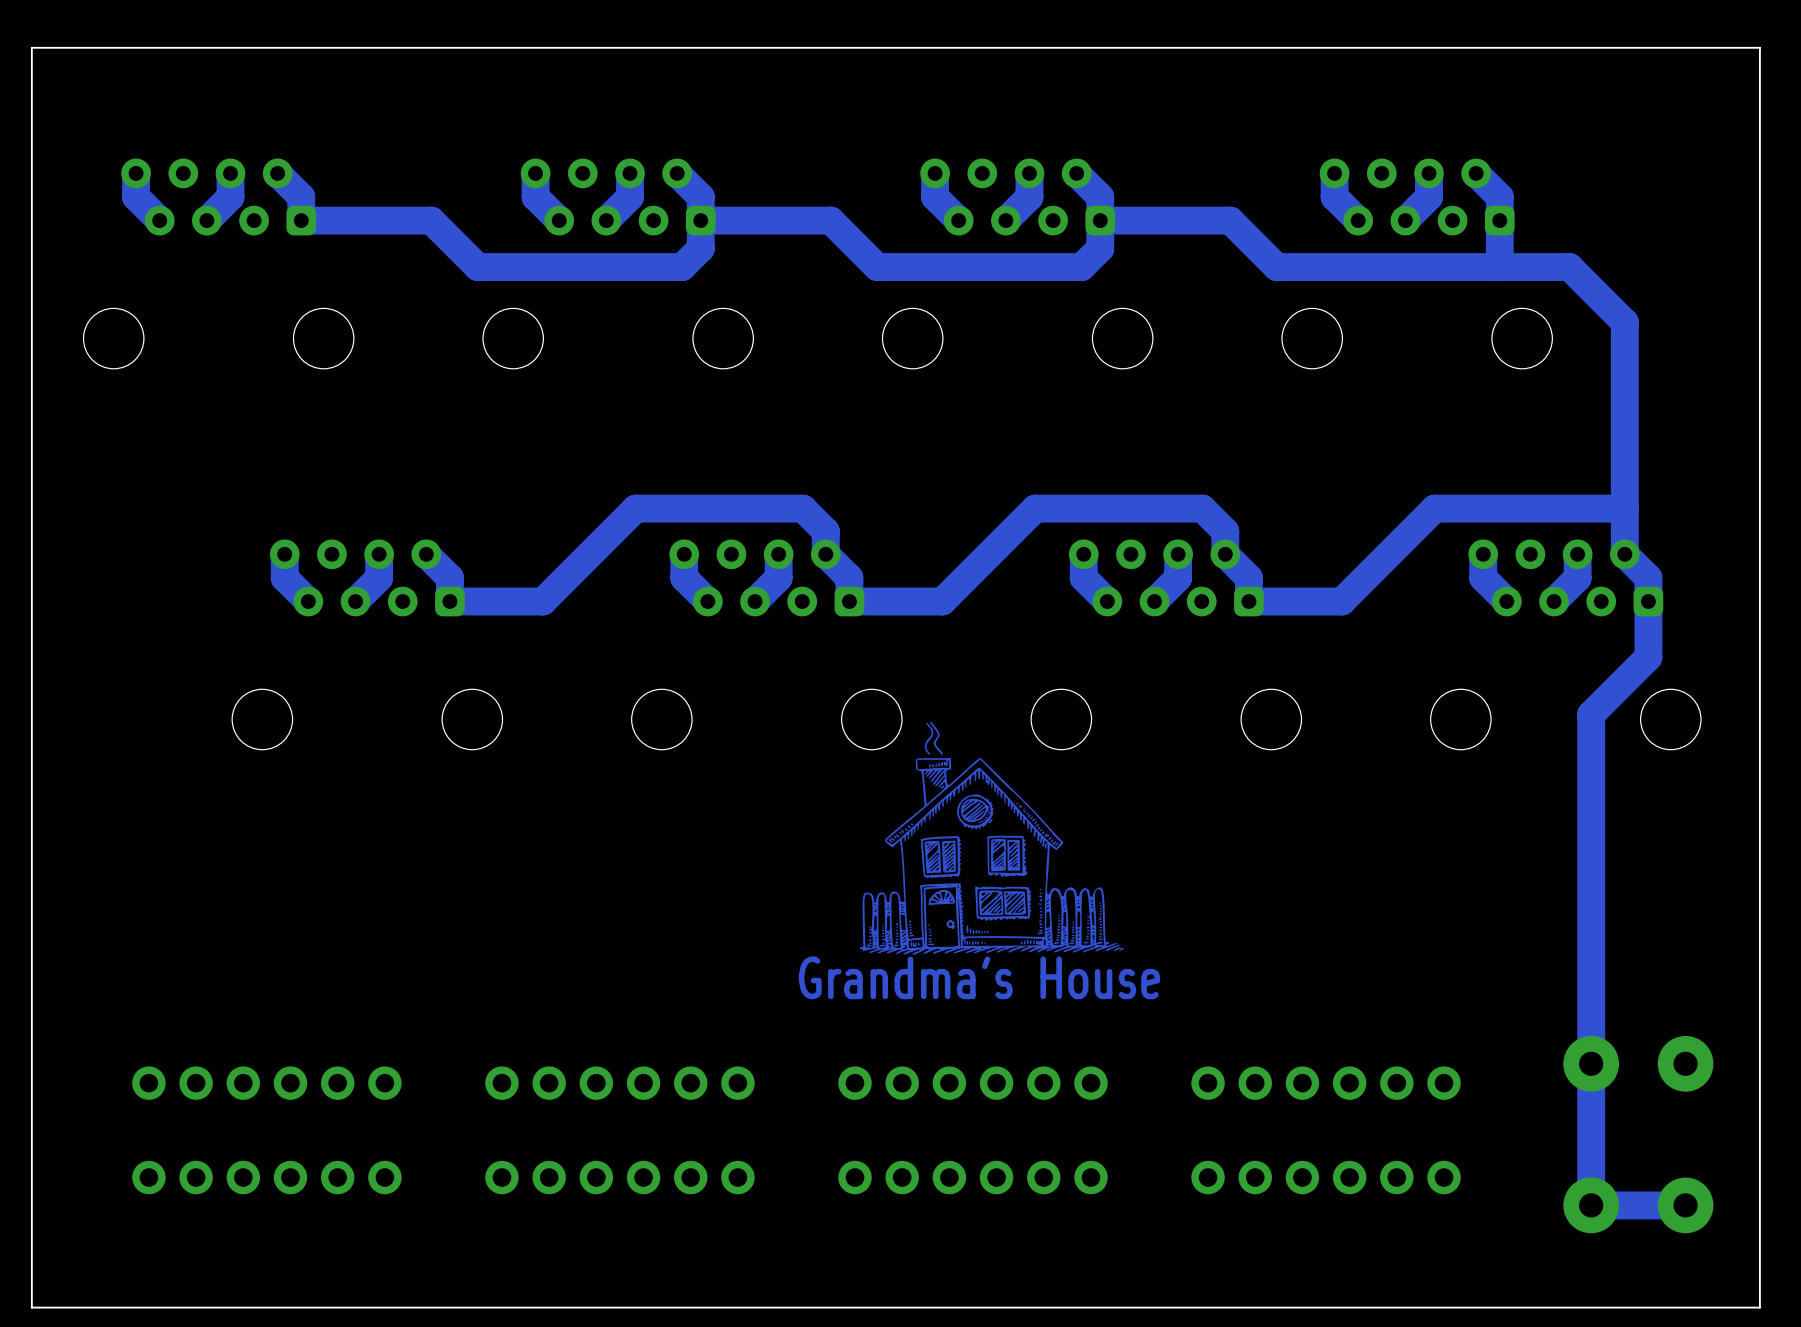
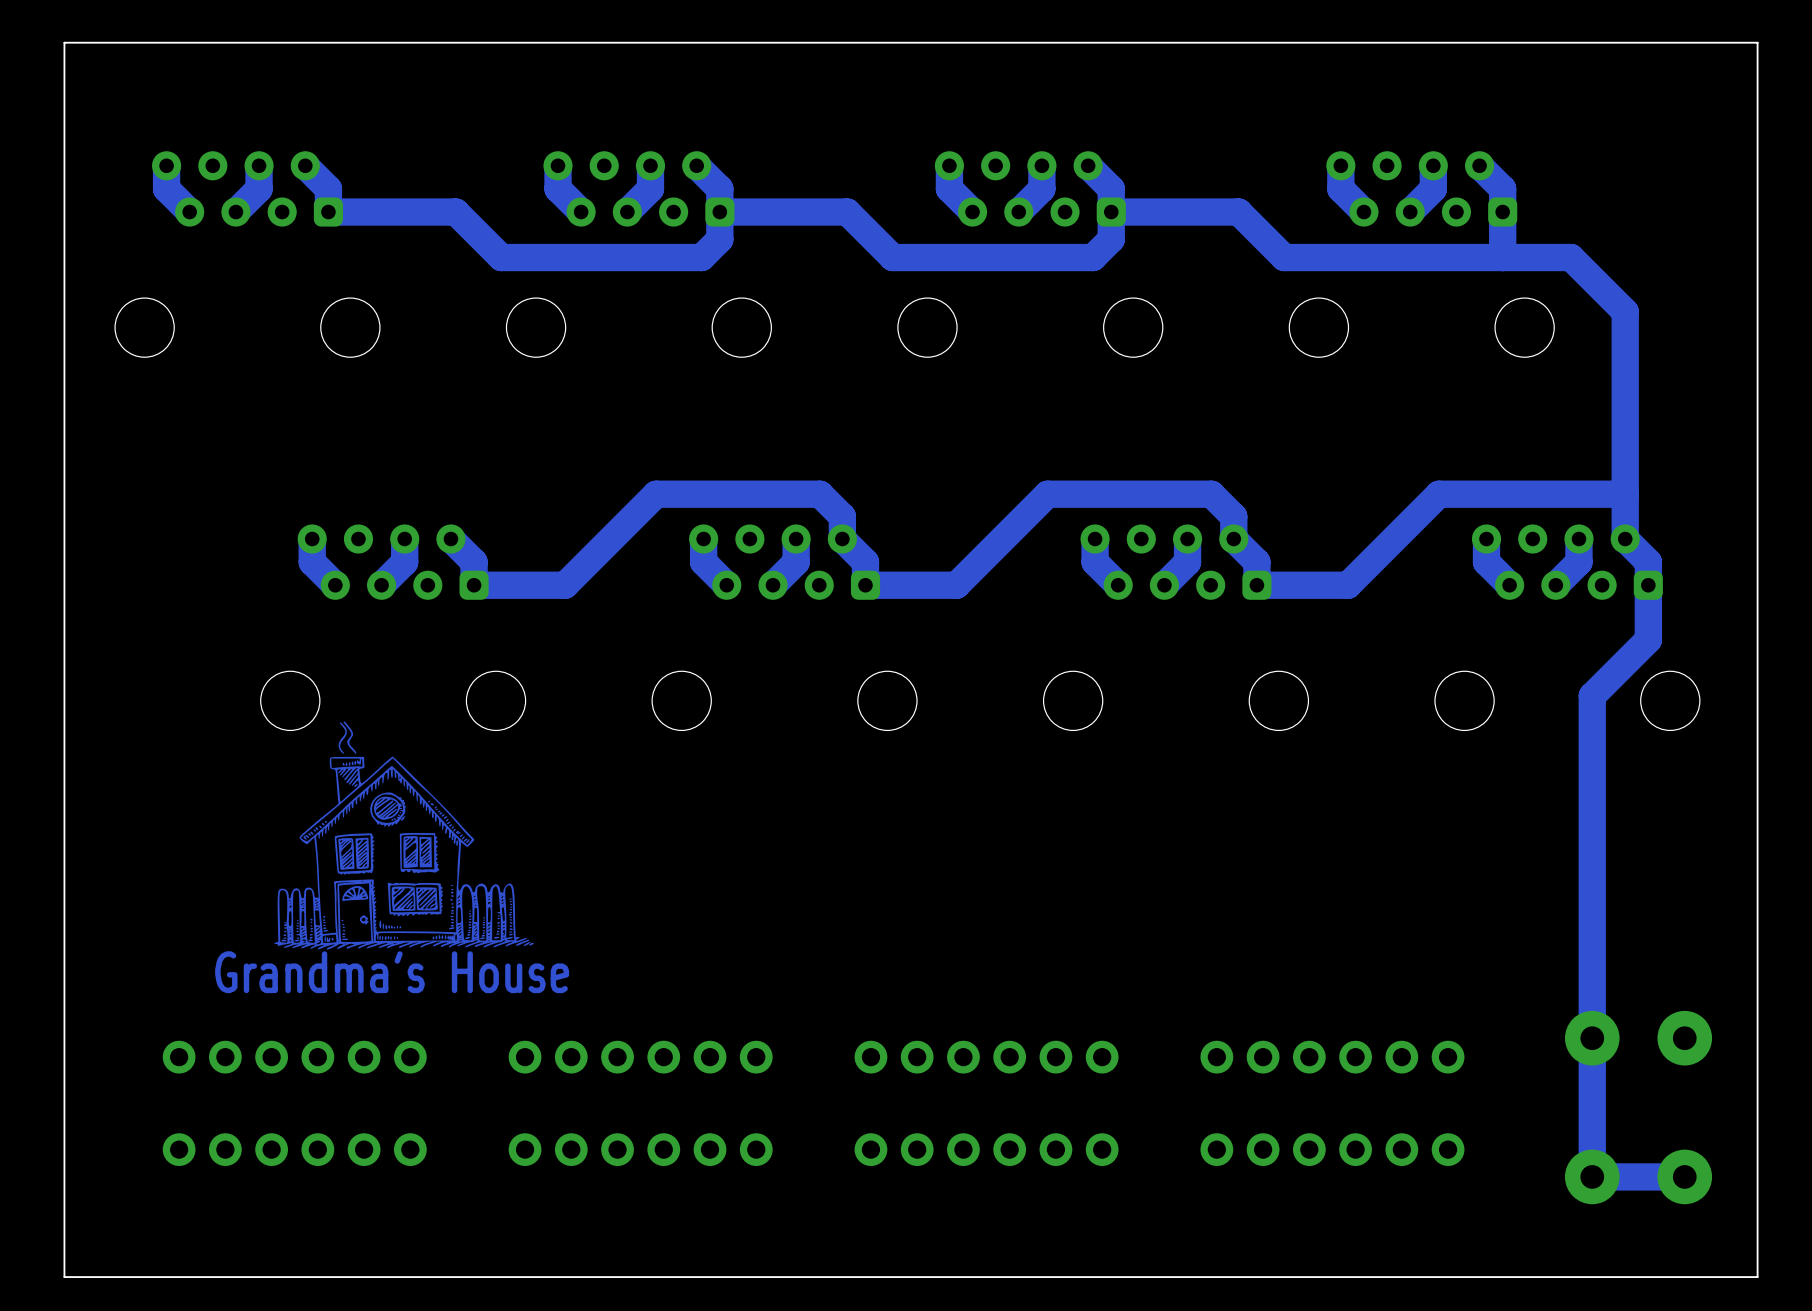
drawing: [859, 721, 1125, 955] -> none
drawing: none -> [274, 721, 534, 950]
text: Grandma's House (979, 977) -> none
text: none -> Grandma's House (392, 972)

